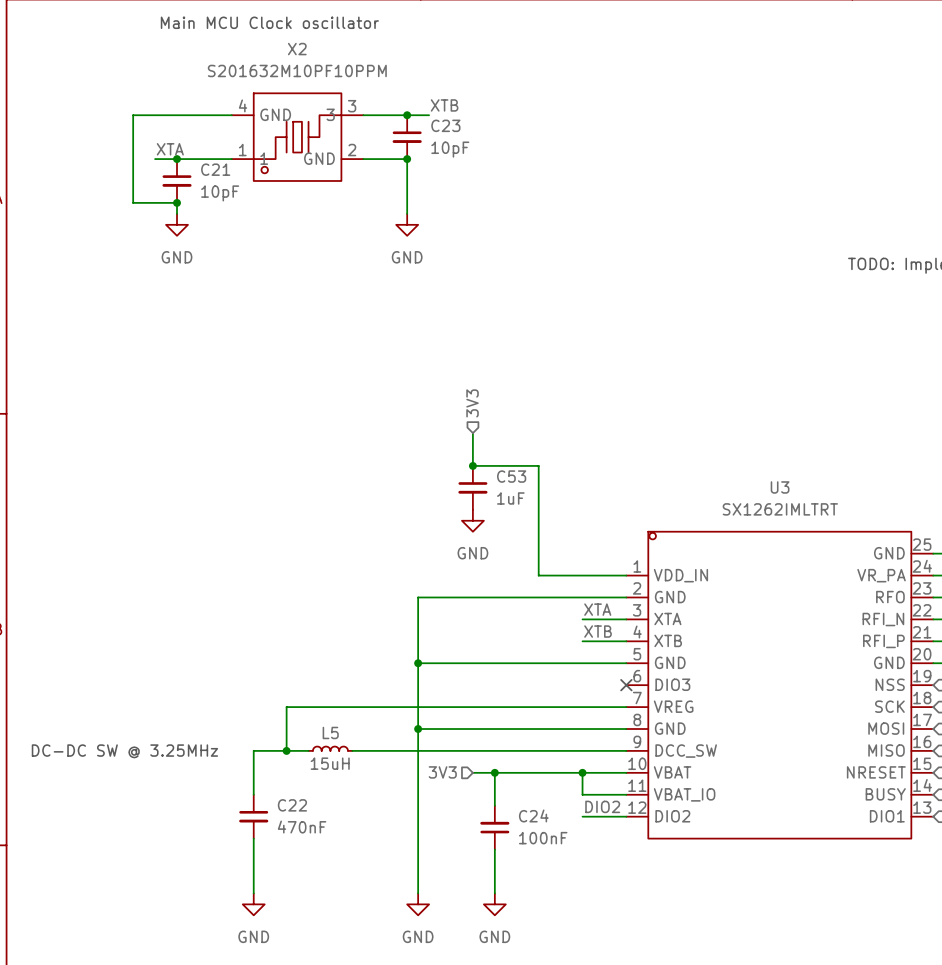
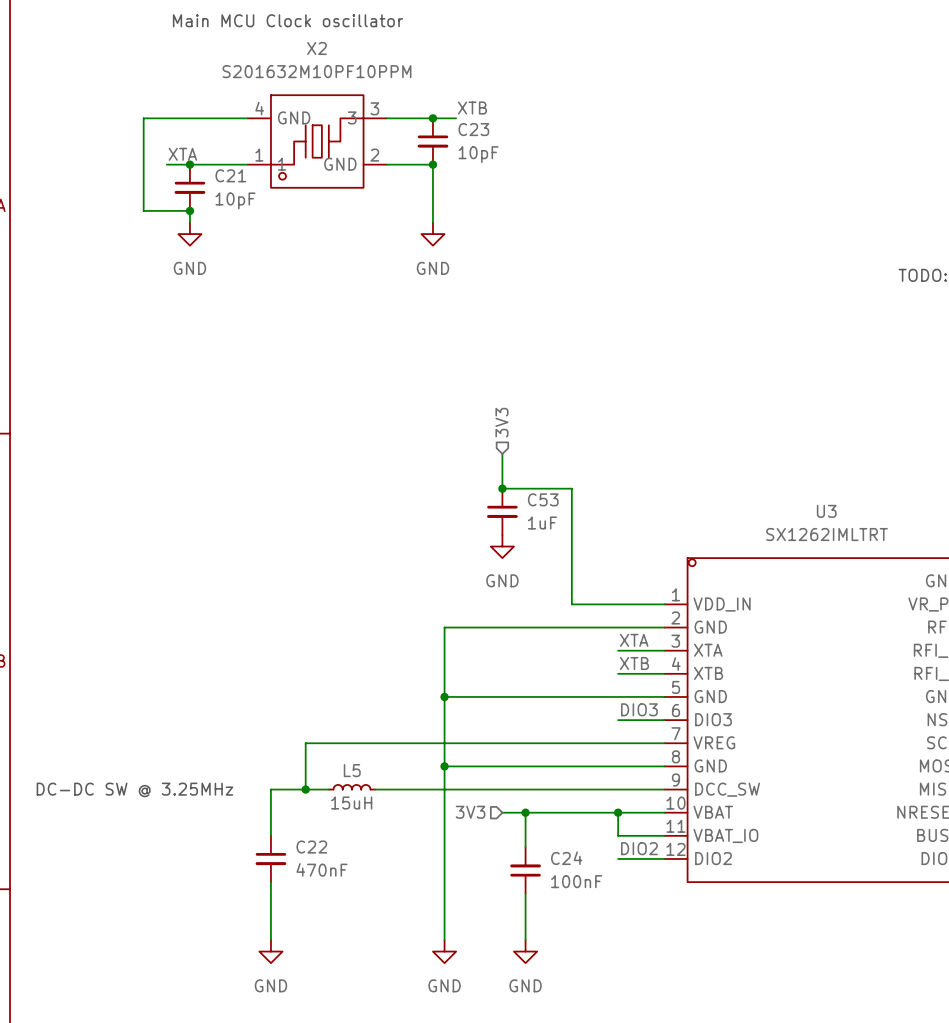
label: none -> DIO3 (639, 709)
wire: none -> (618, 720) (664, 720)
no-connect mark: (626, 685) -> none

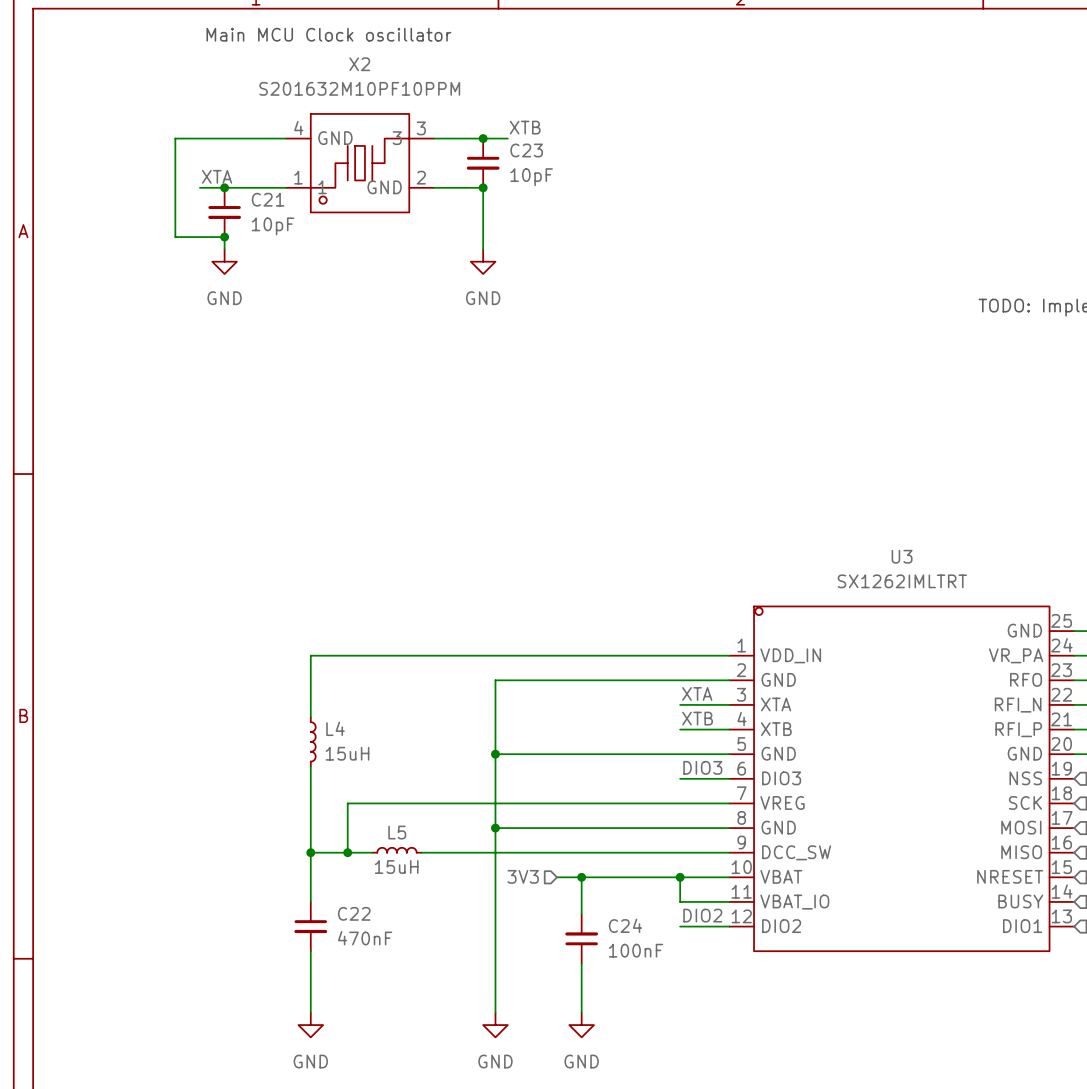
hierarchical label: 3V3 (501, 422) -> none
wire: (502, 453) (502, 488) (571, 488) (571, 604) -> (310, 717) (310, 655) (630, 655)
junction: (502, 488) -> none
C53: 1uF (502, 511) -> none
power symbol: GND (502, 546) -> none
L4: none -> 15uH (313, 741)
wire: none -> (310, 766) (310, 852)
text: DC-DC SW @ 3.25MHz (134, 789) -> none
junction: none -> (310, 852)

